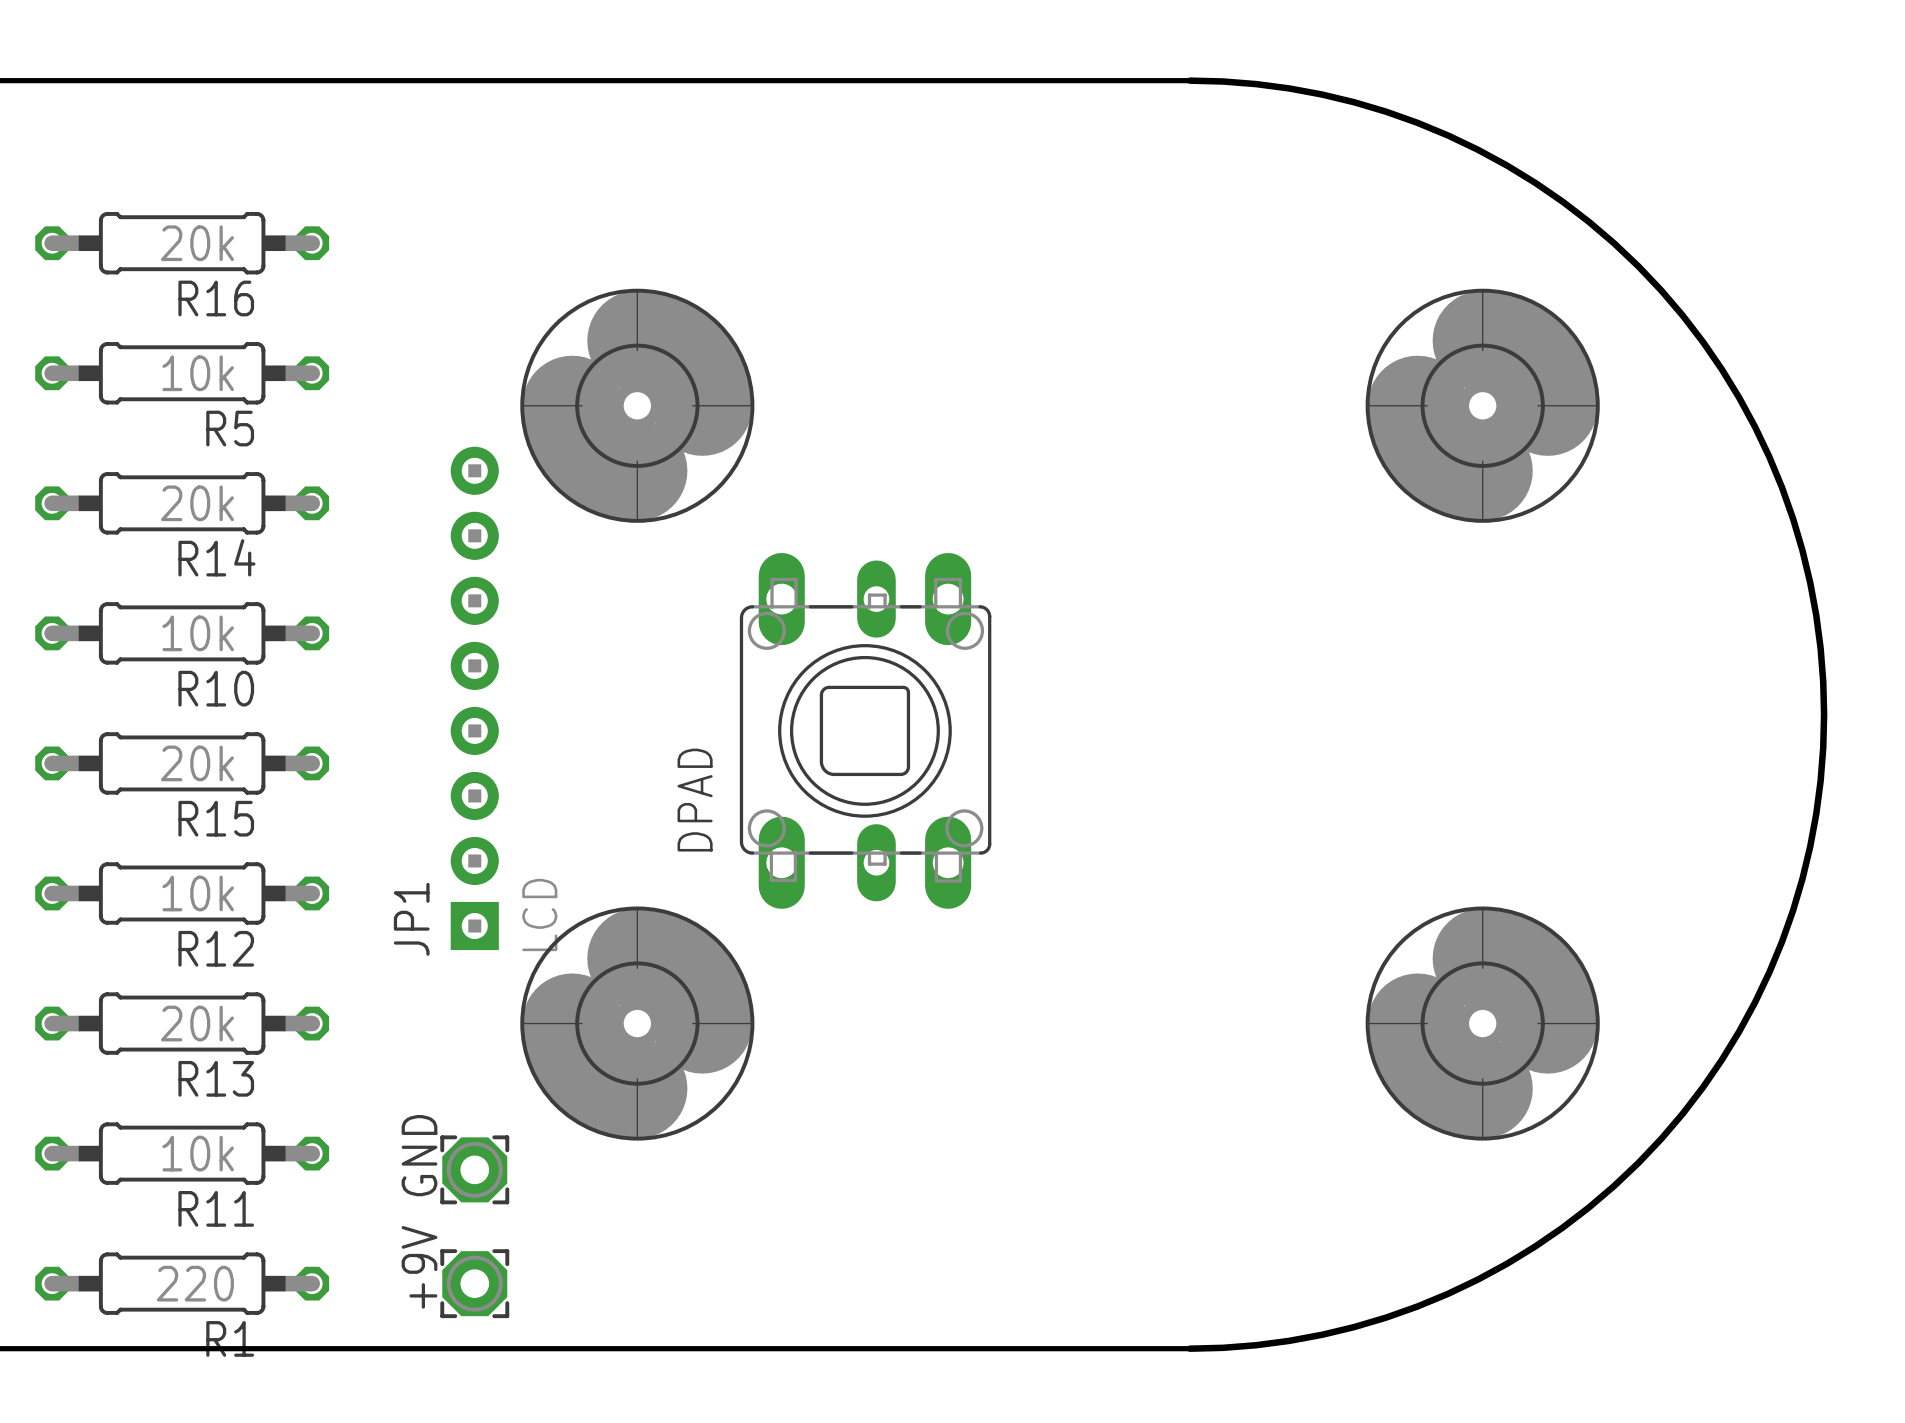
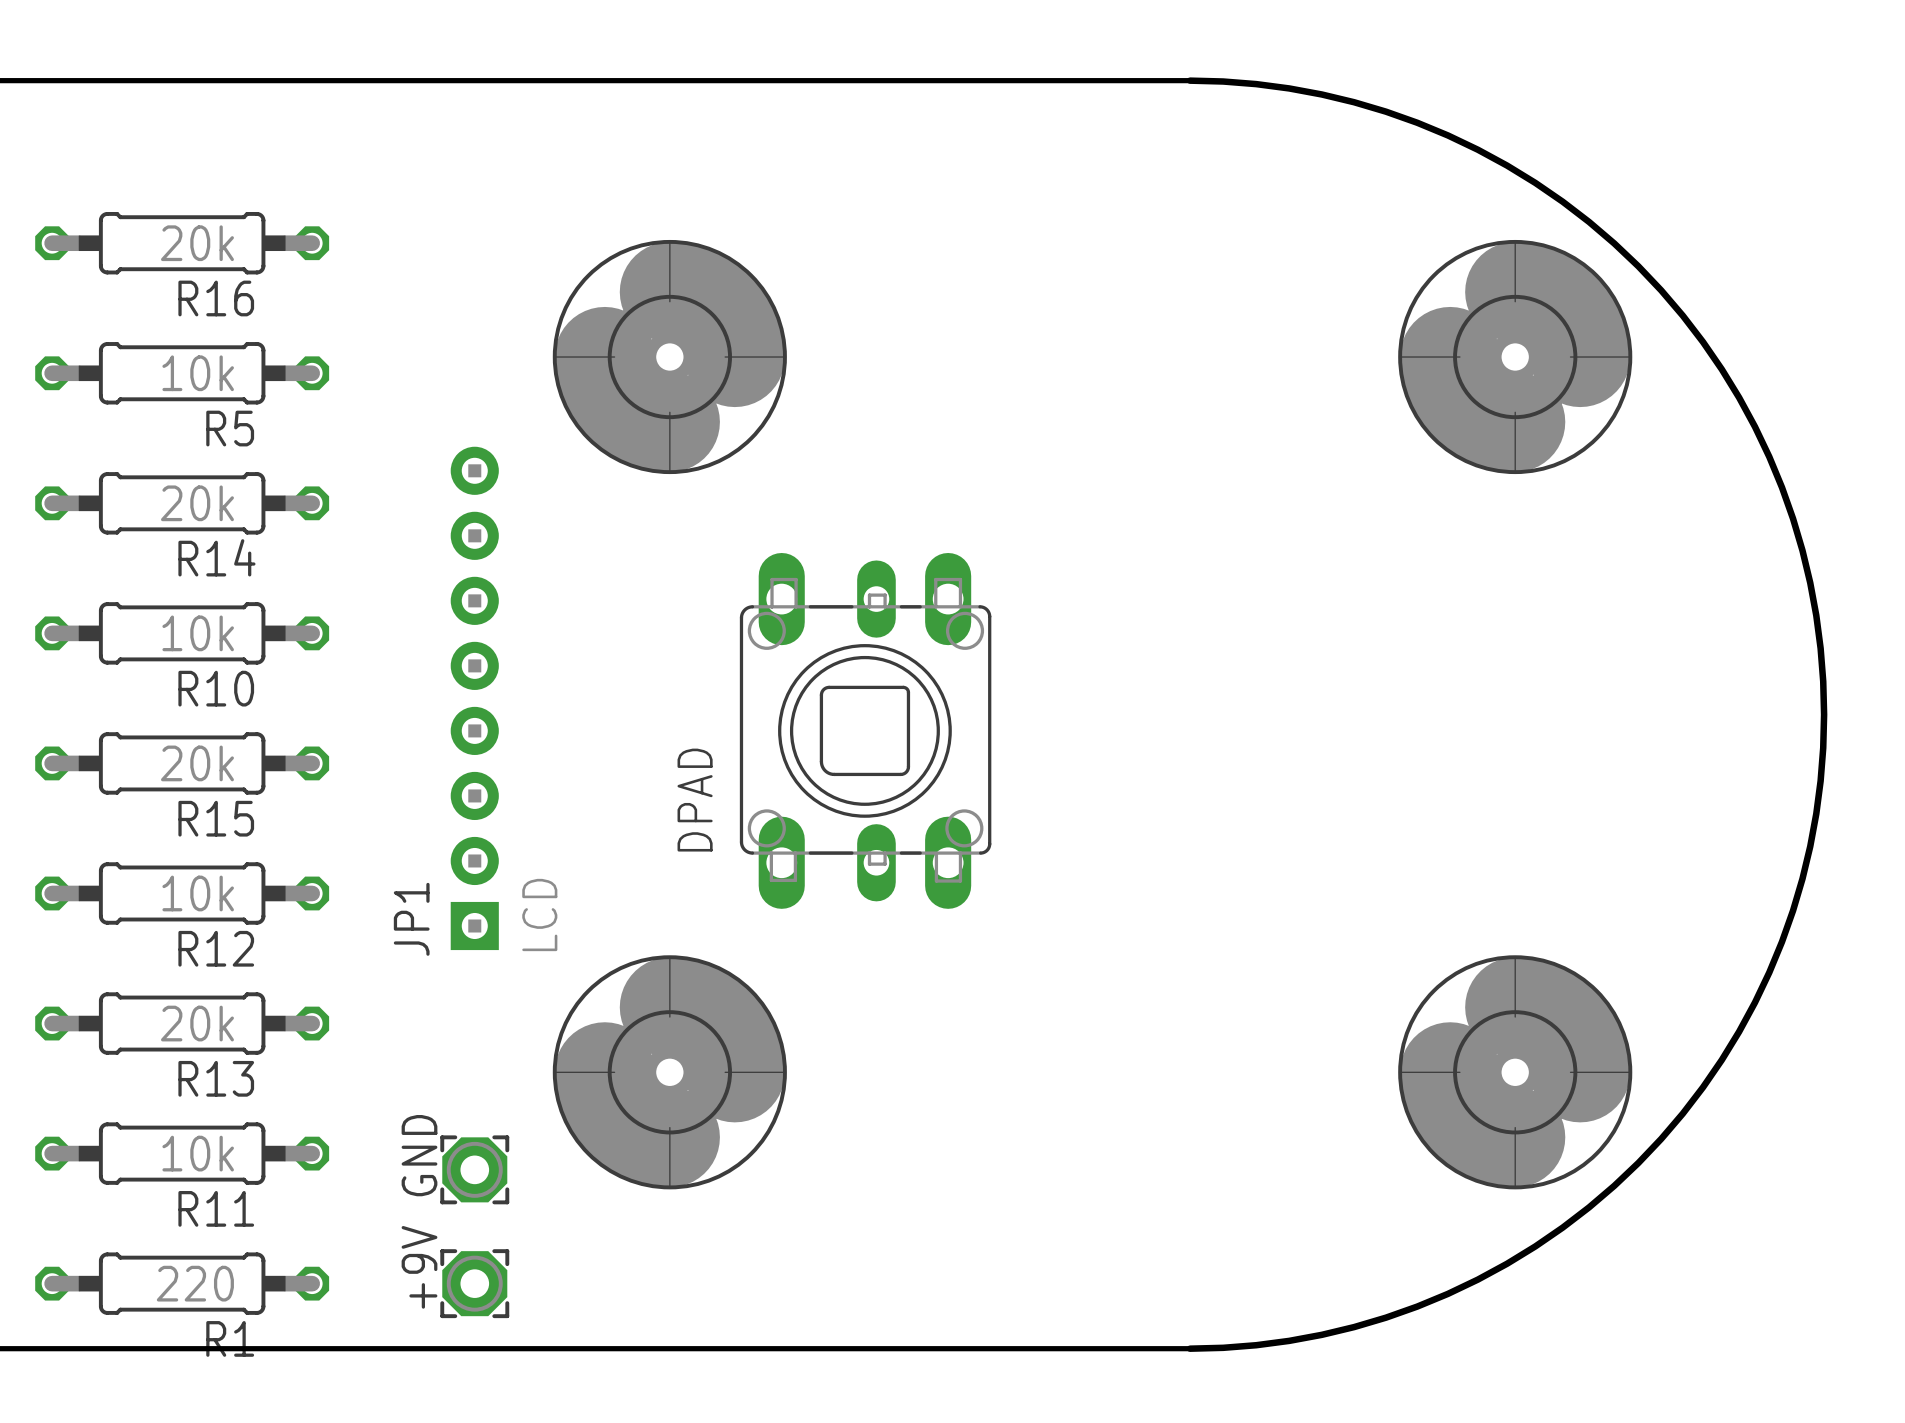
part position: (637, 405) -> (669, 357)
part position: (1482, 405) -> (1515, 357)
part position: (637, 1023) -> (669, 1072)
part position: (1482, 1023) -> (1515, 1072)

